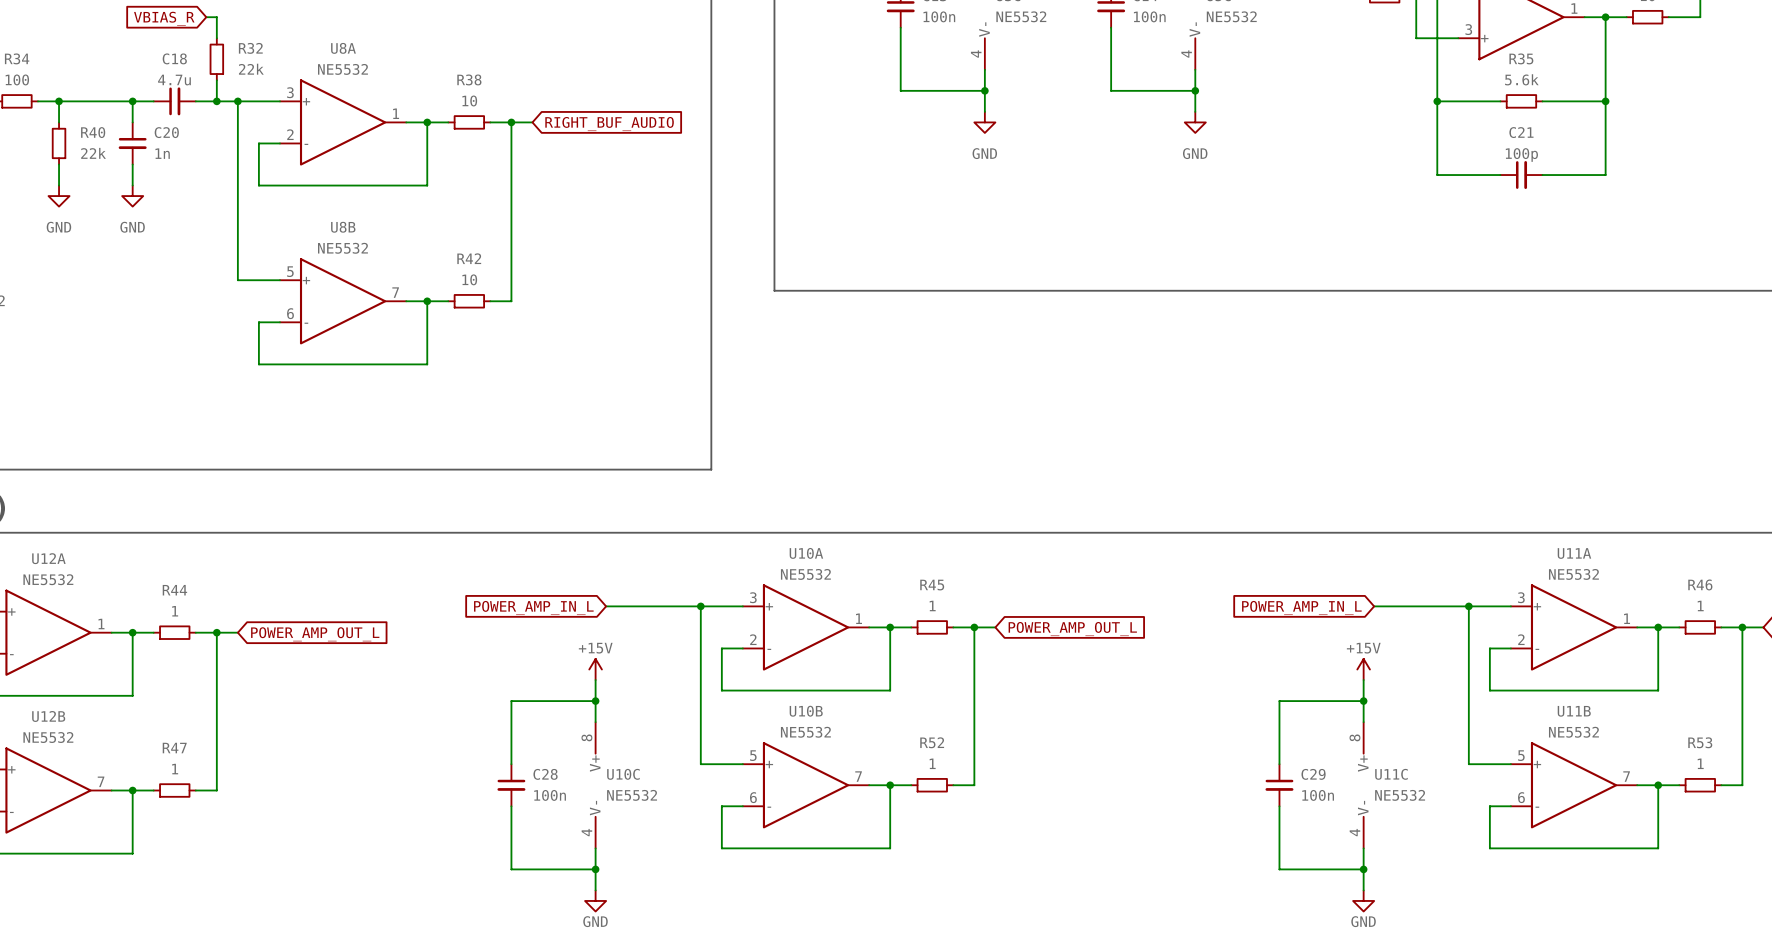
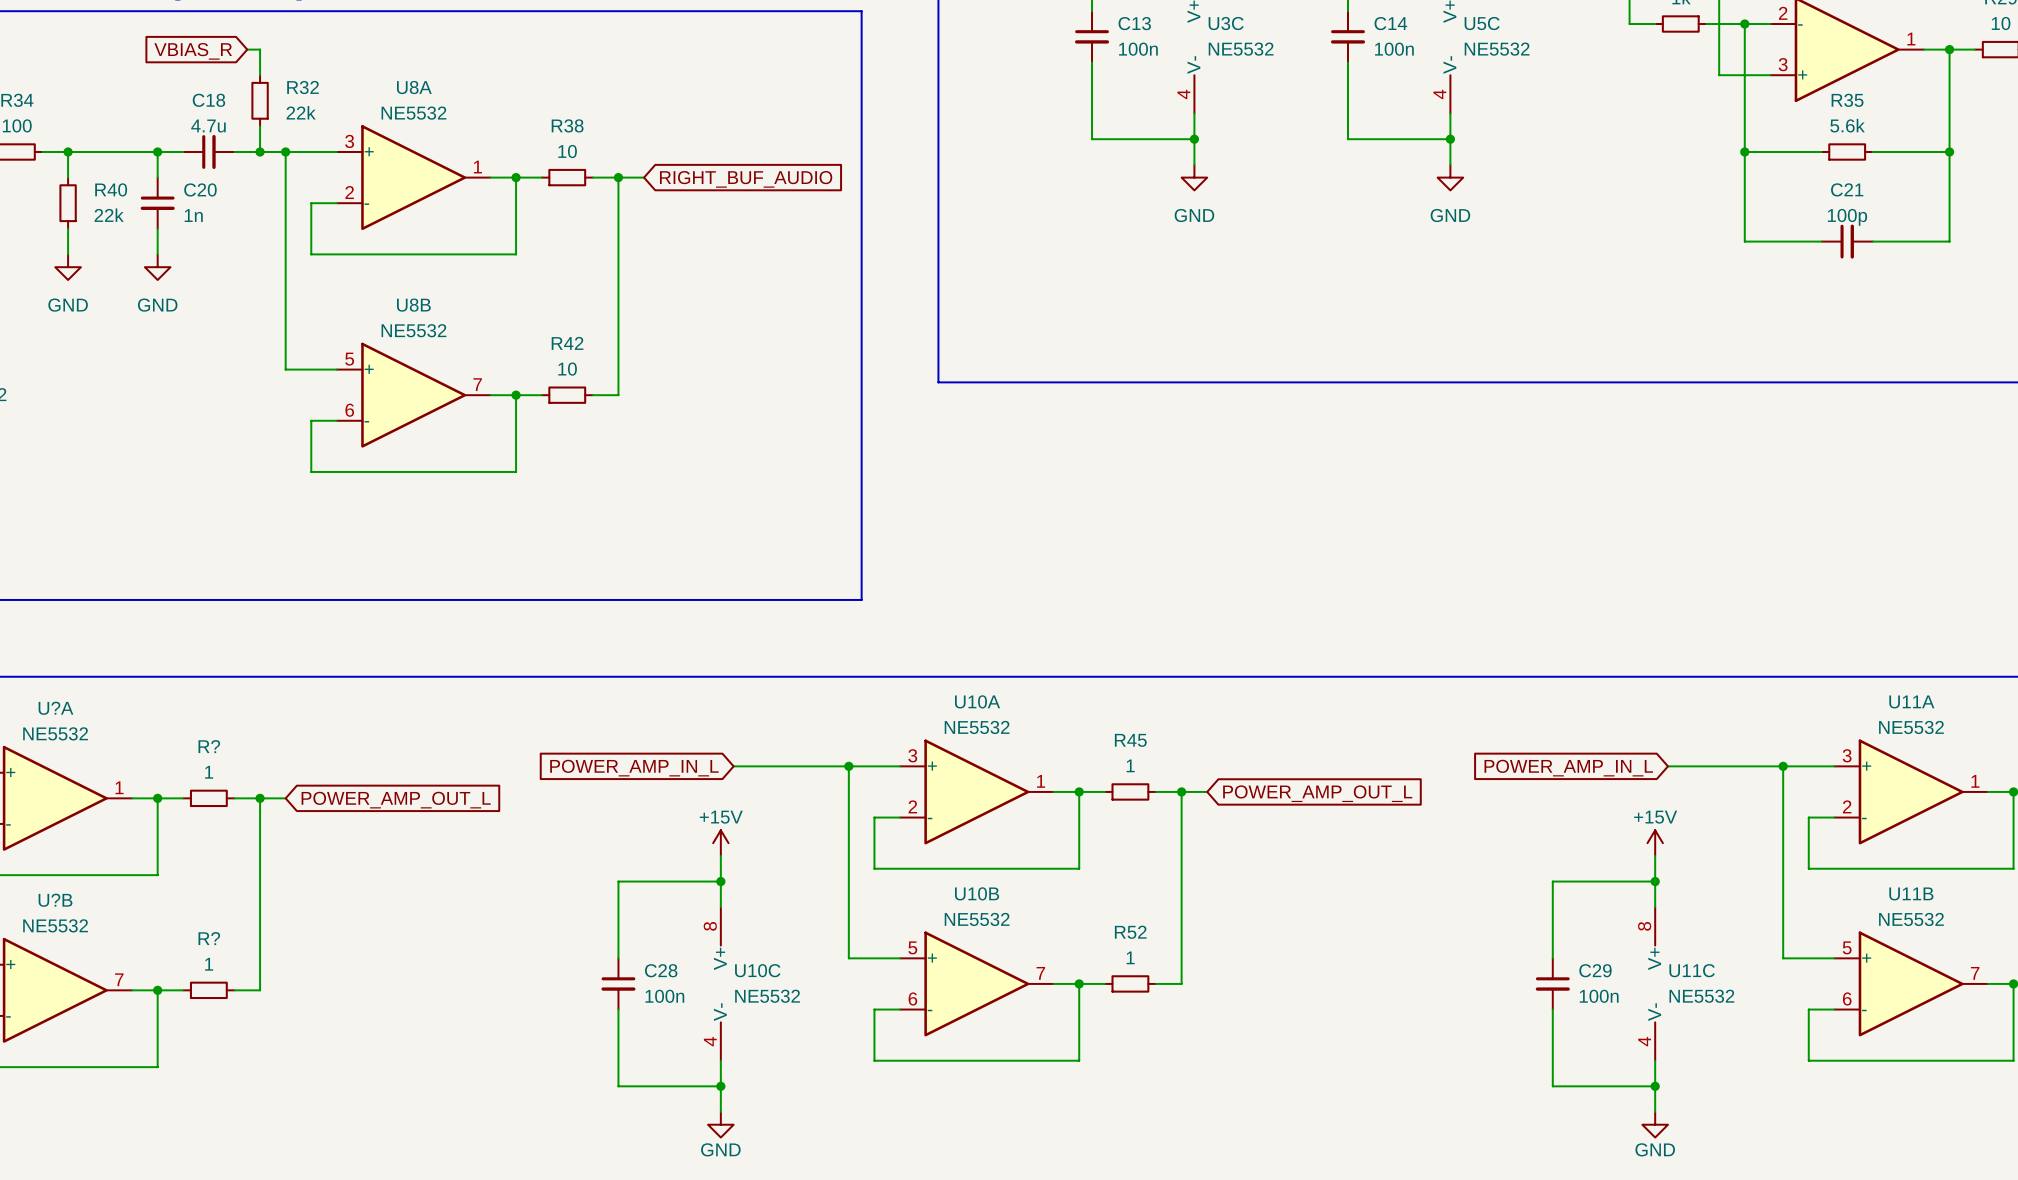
U12A name: U12A (48, 558) -> U?A (55, 708)
R44 name: R44 (174, 590) -> R? (209, 746)
U12B name: U12B (48, 716) -> U?B (55, 900)
R47 name: R47 (174, 748) -> R? (209, 938)

